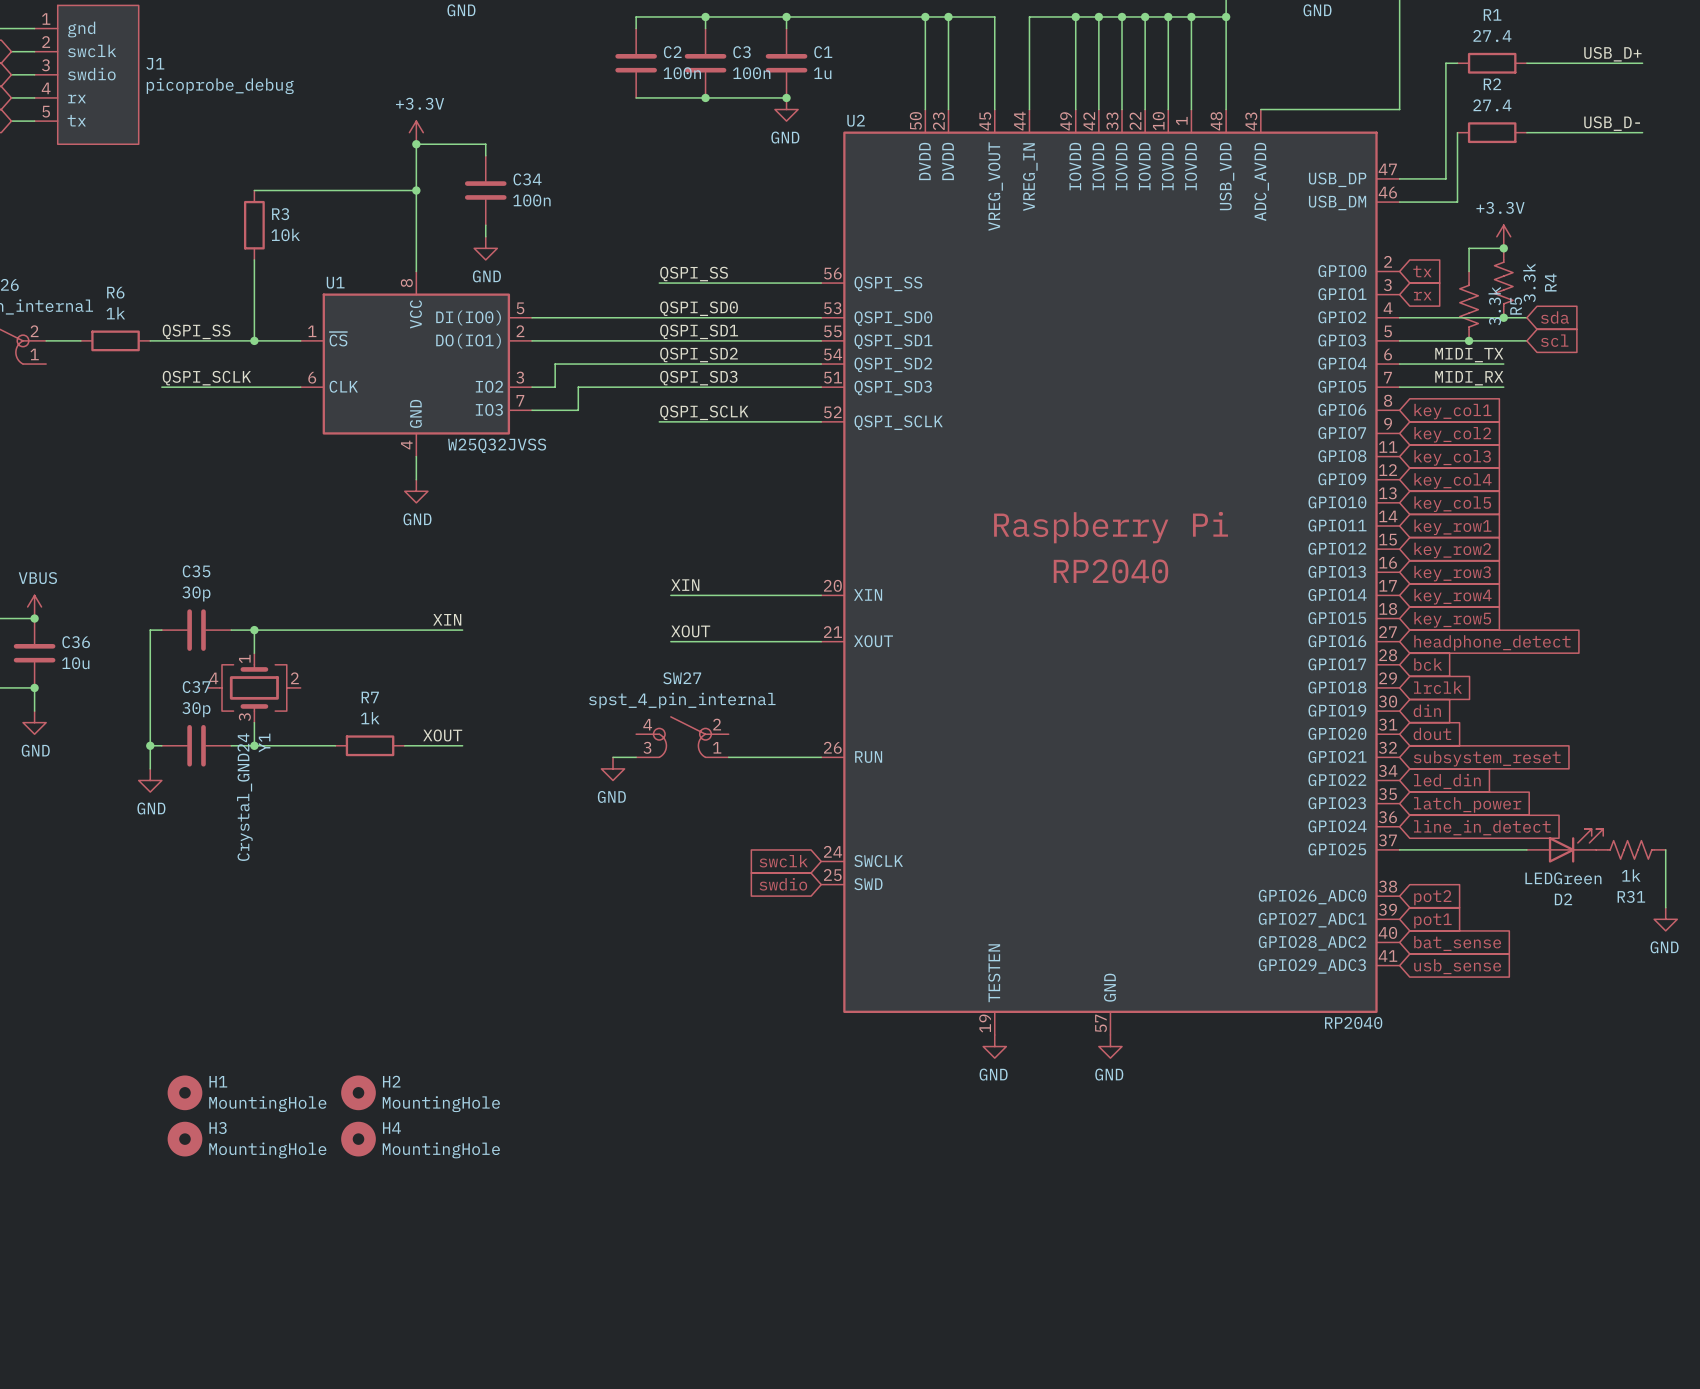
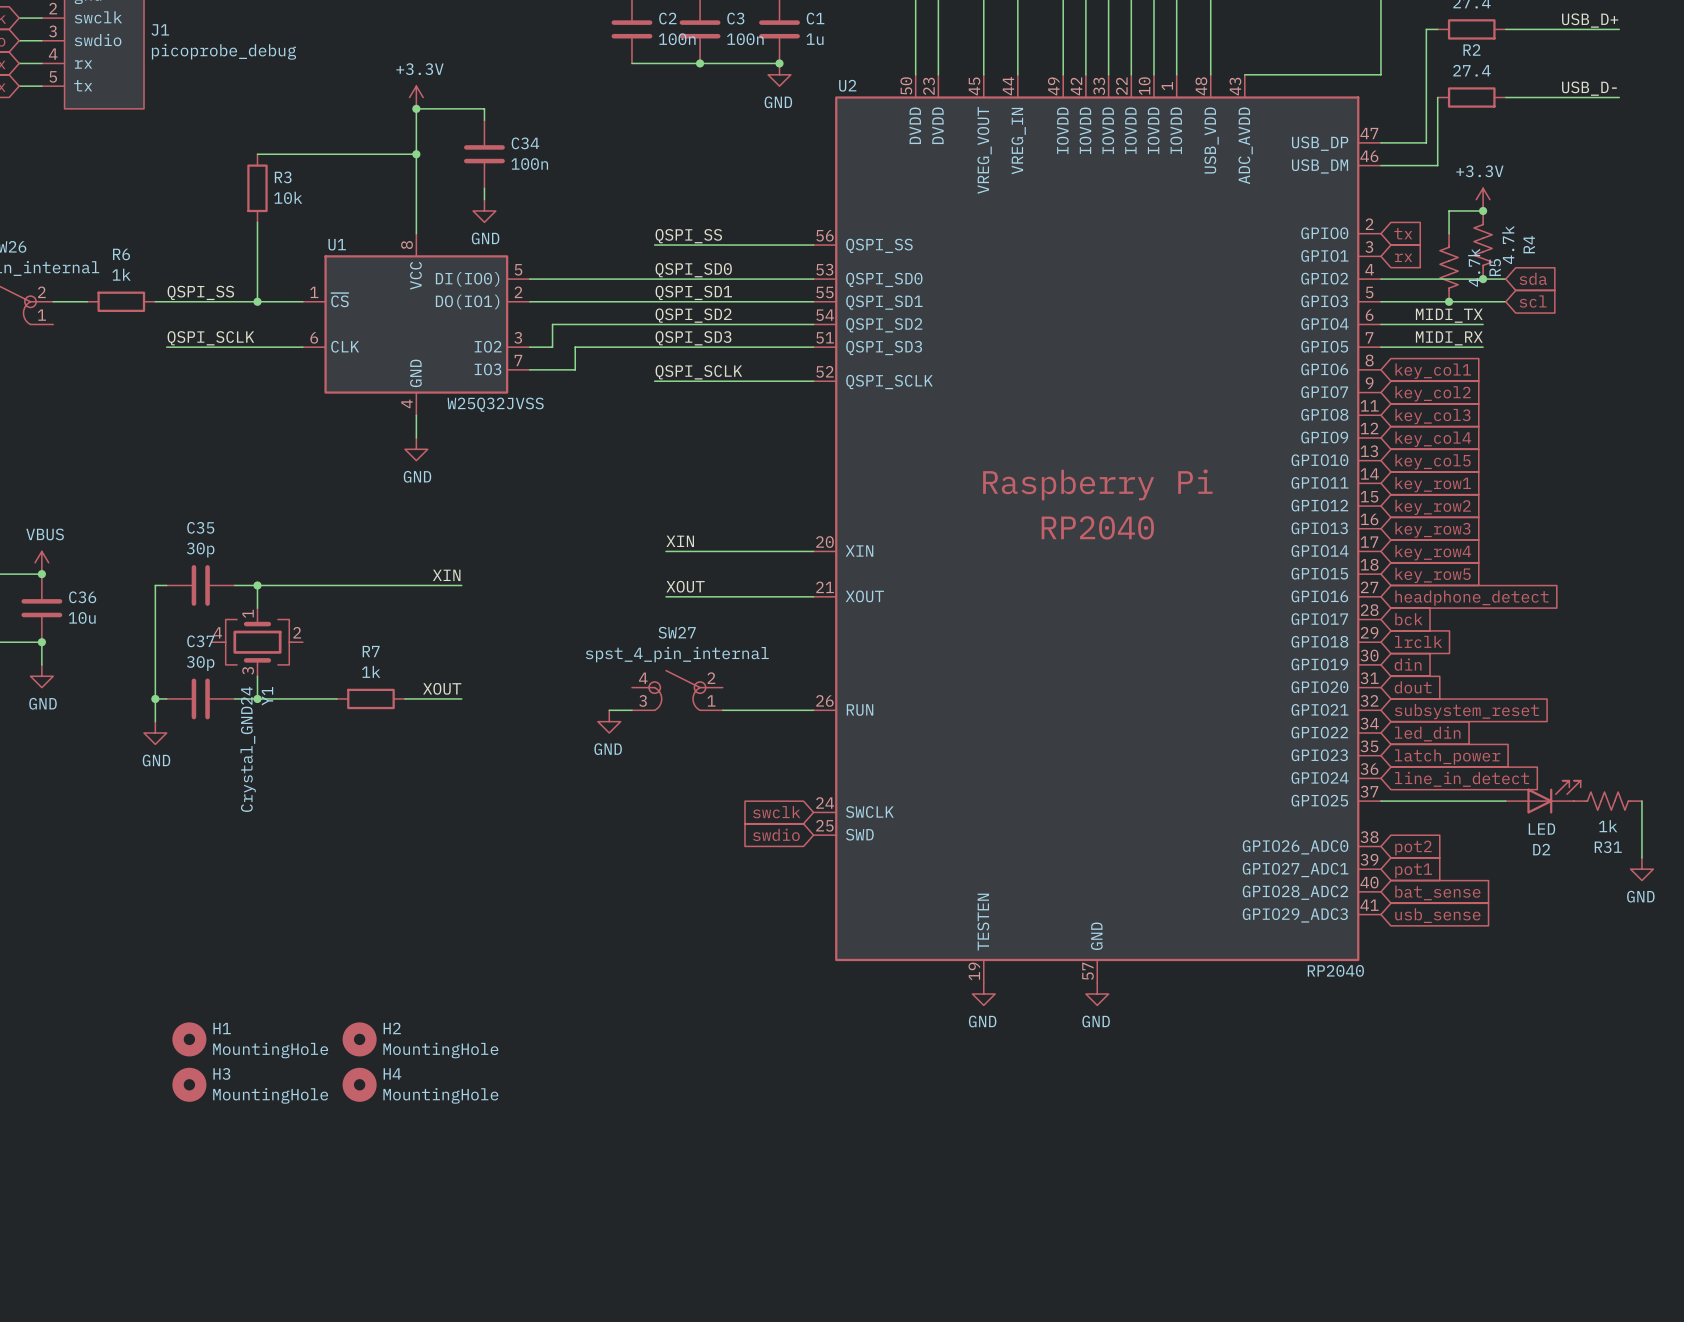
R4 value: 3.3k (1529, 282) -> 4.7k (1508, 244)
R5 value: 3.3k (1494, 306) -> 4.7k (1474, 267)
D2 value: LEDGreen (1563, 878) -> LED (1541, 829)

